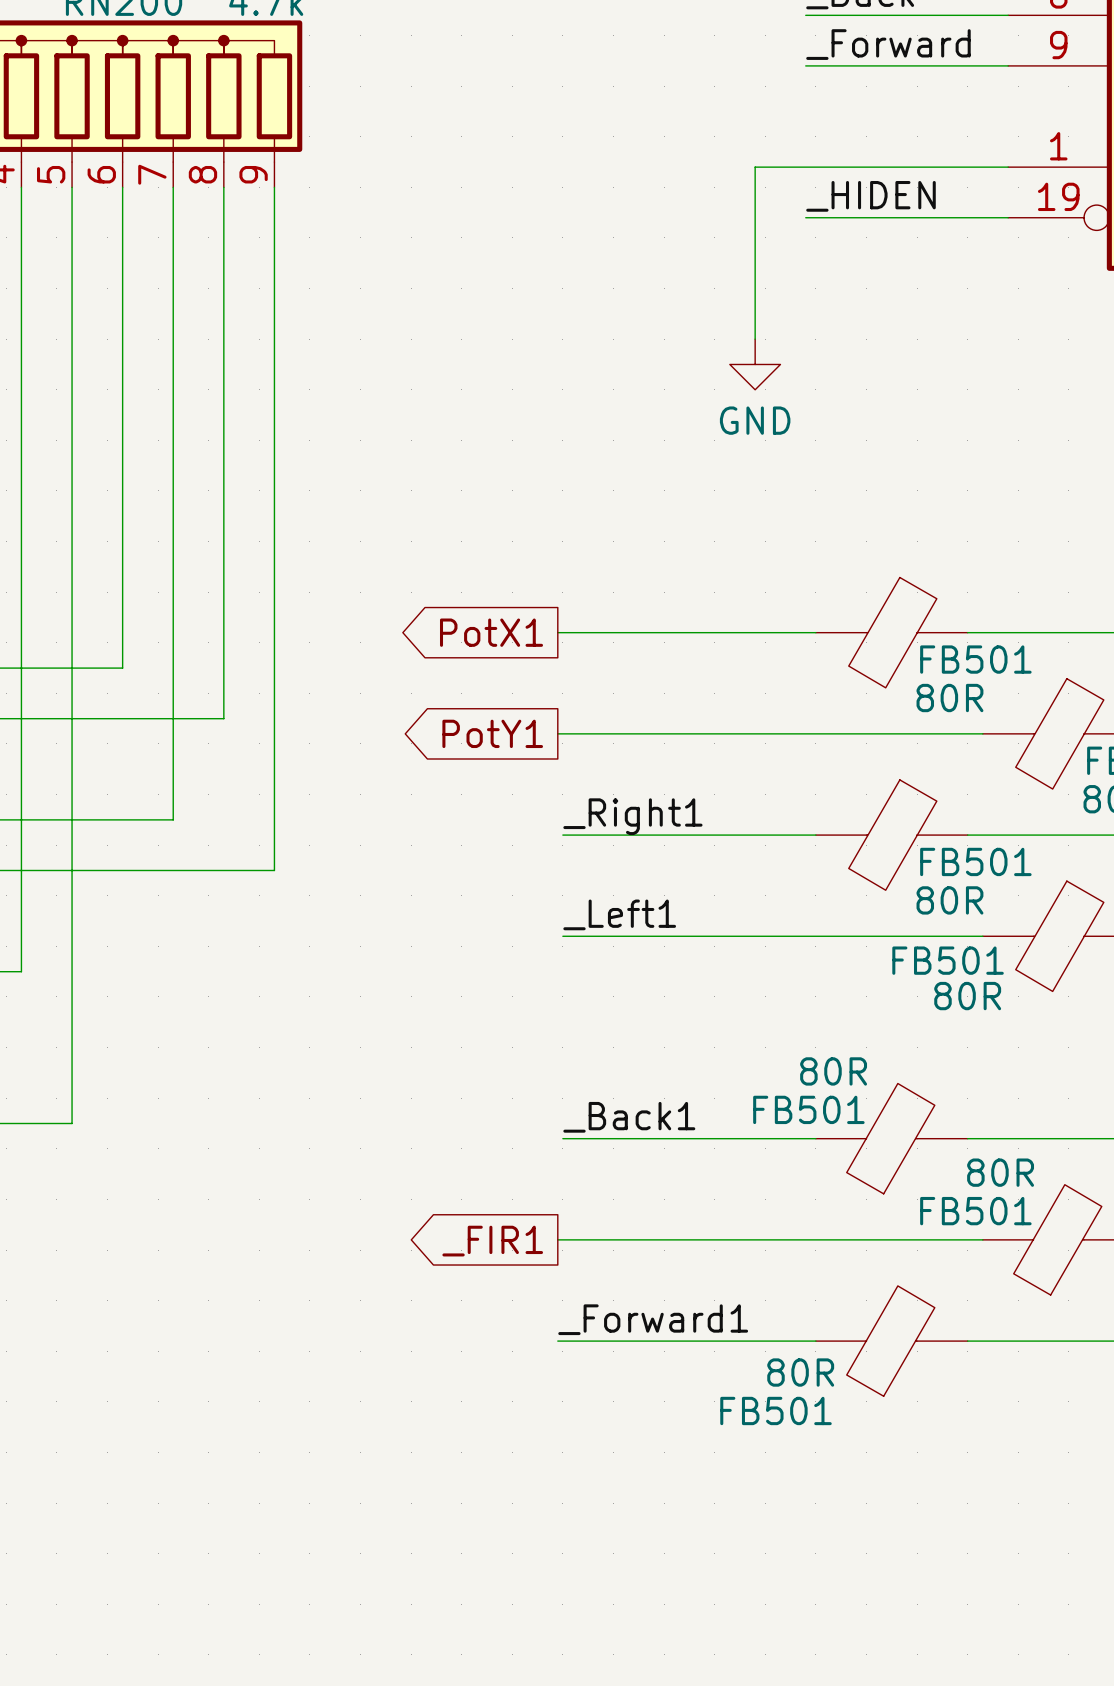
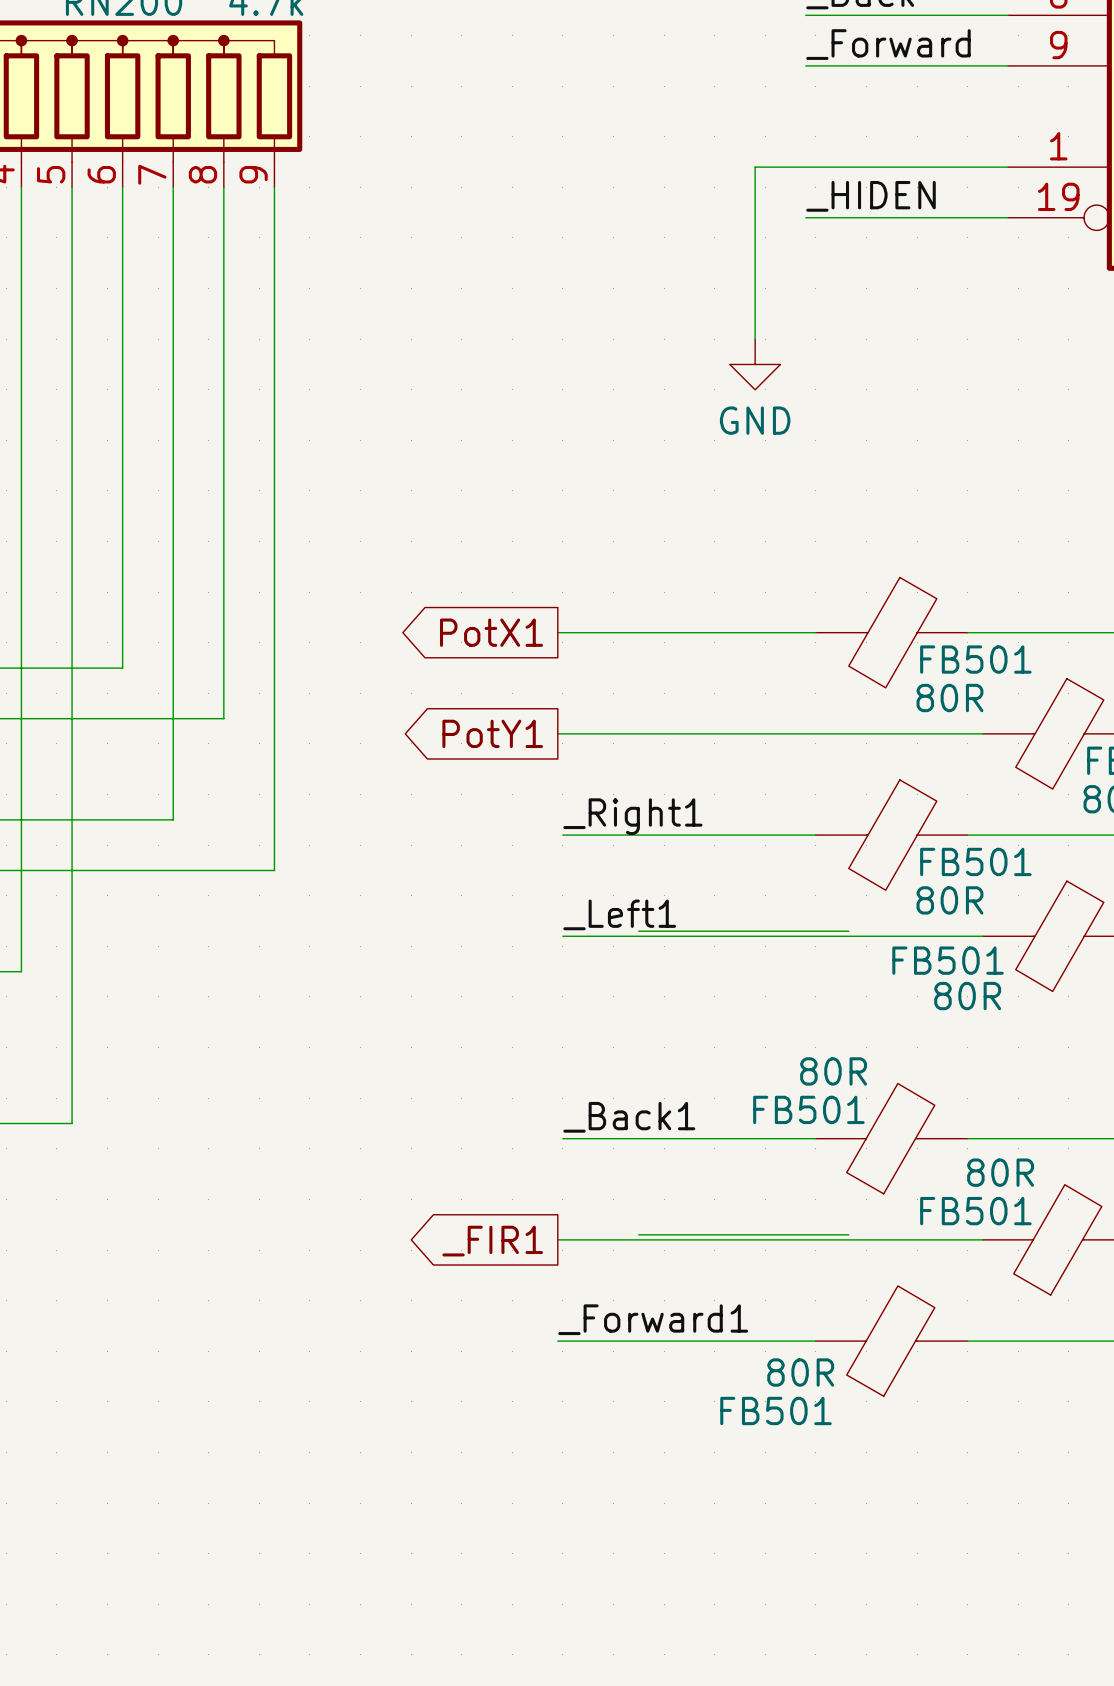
wire: none -> (638, 931) (848, 931)
wire: none -> (638, 1234) (848, 1234)

